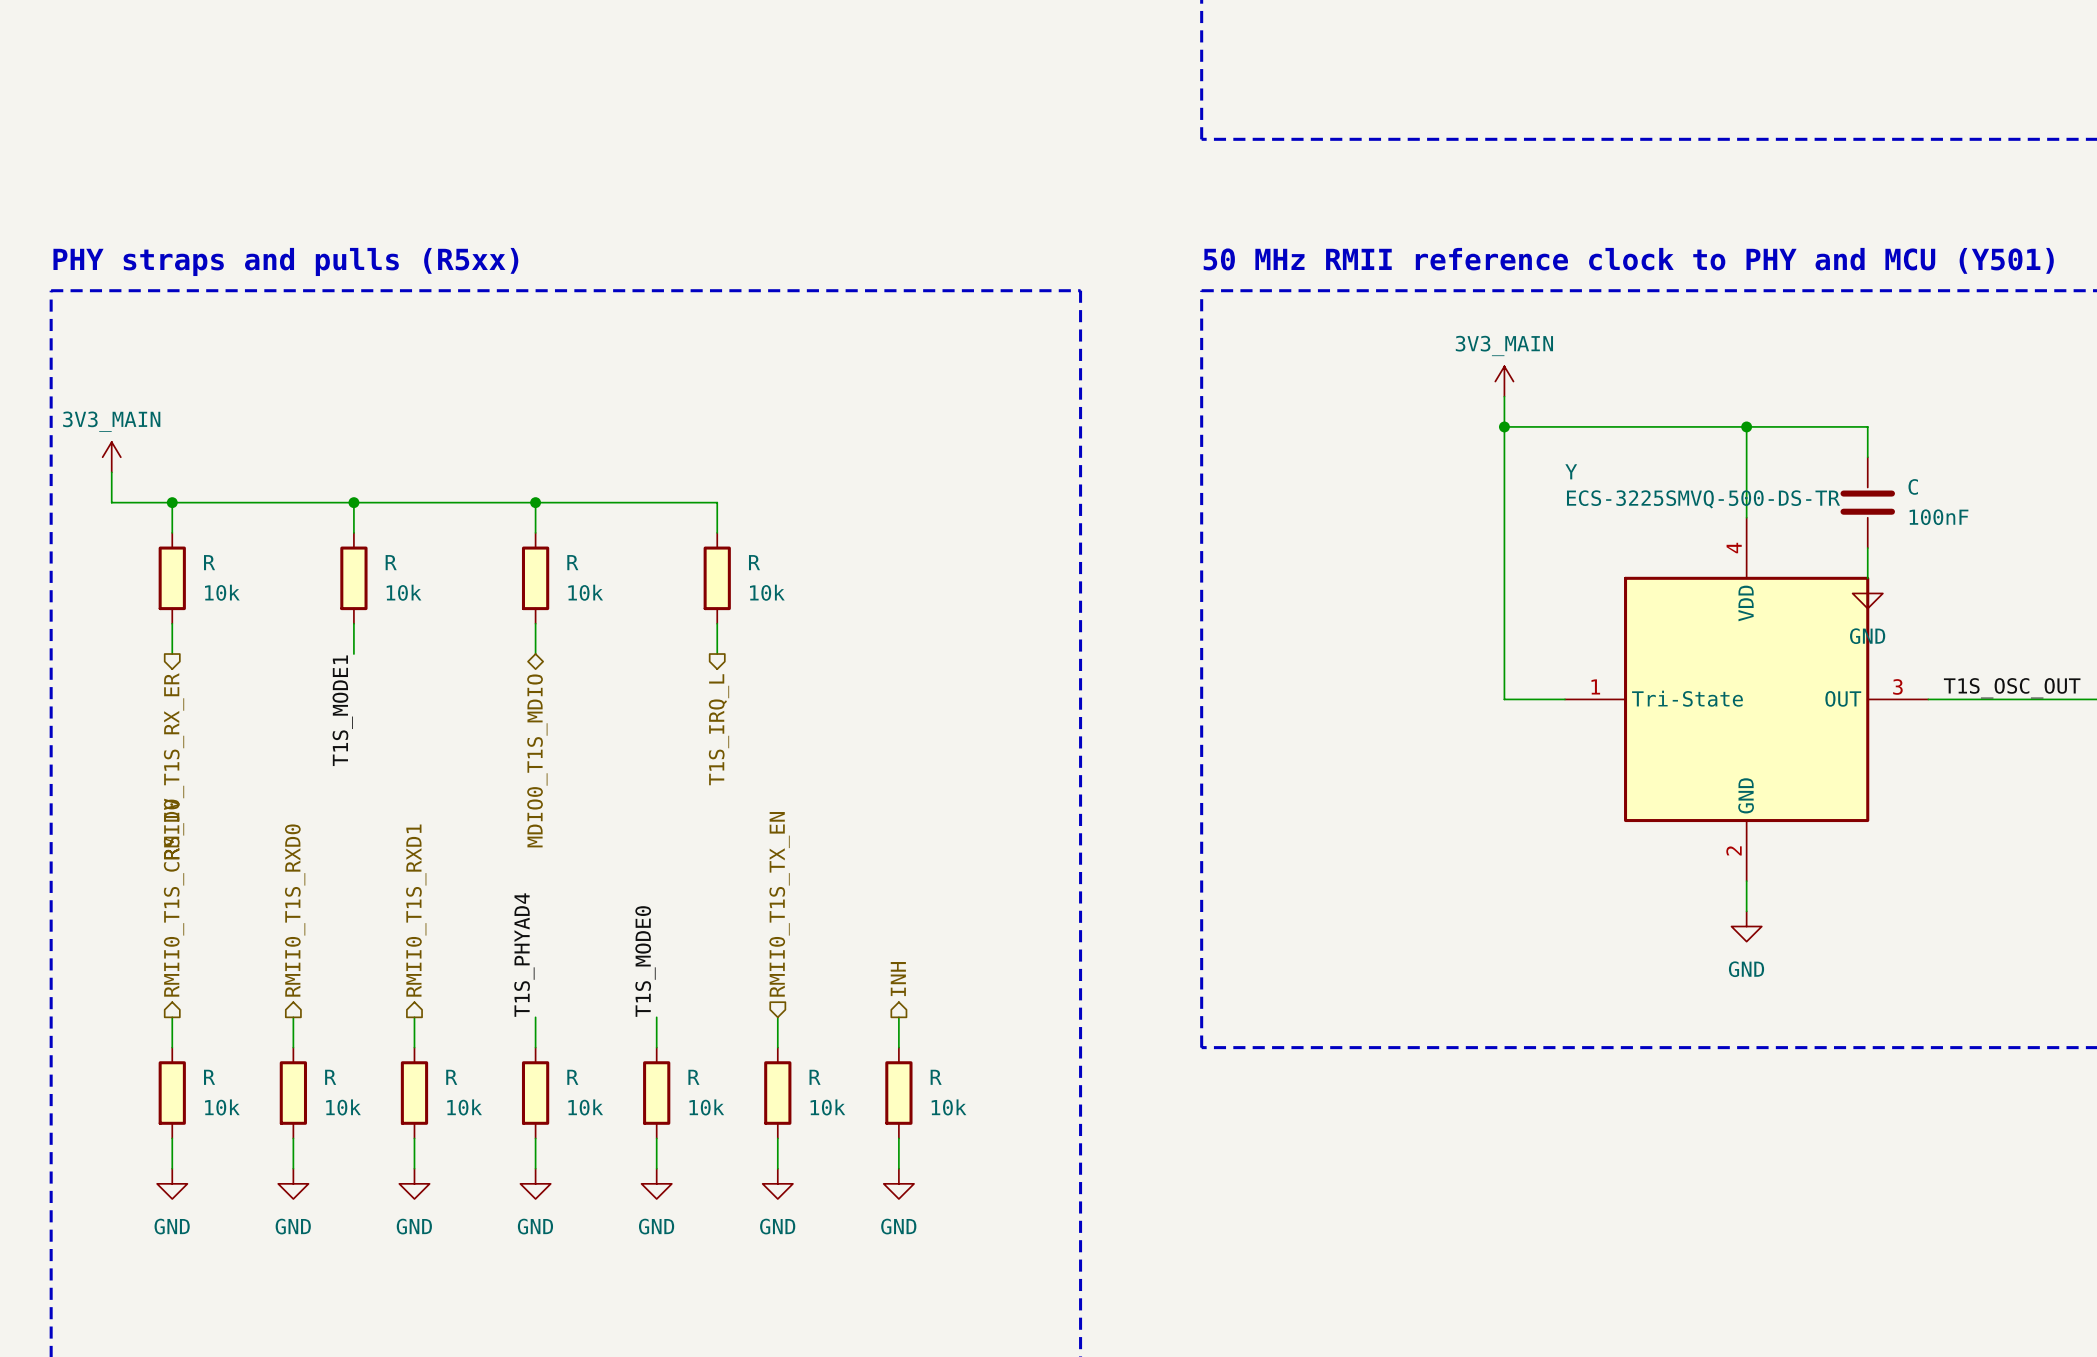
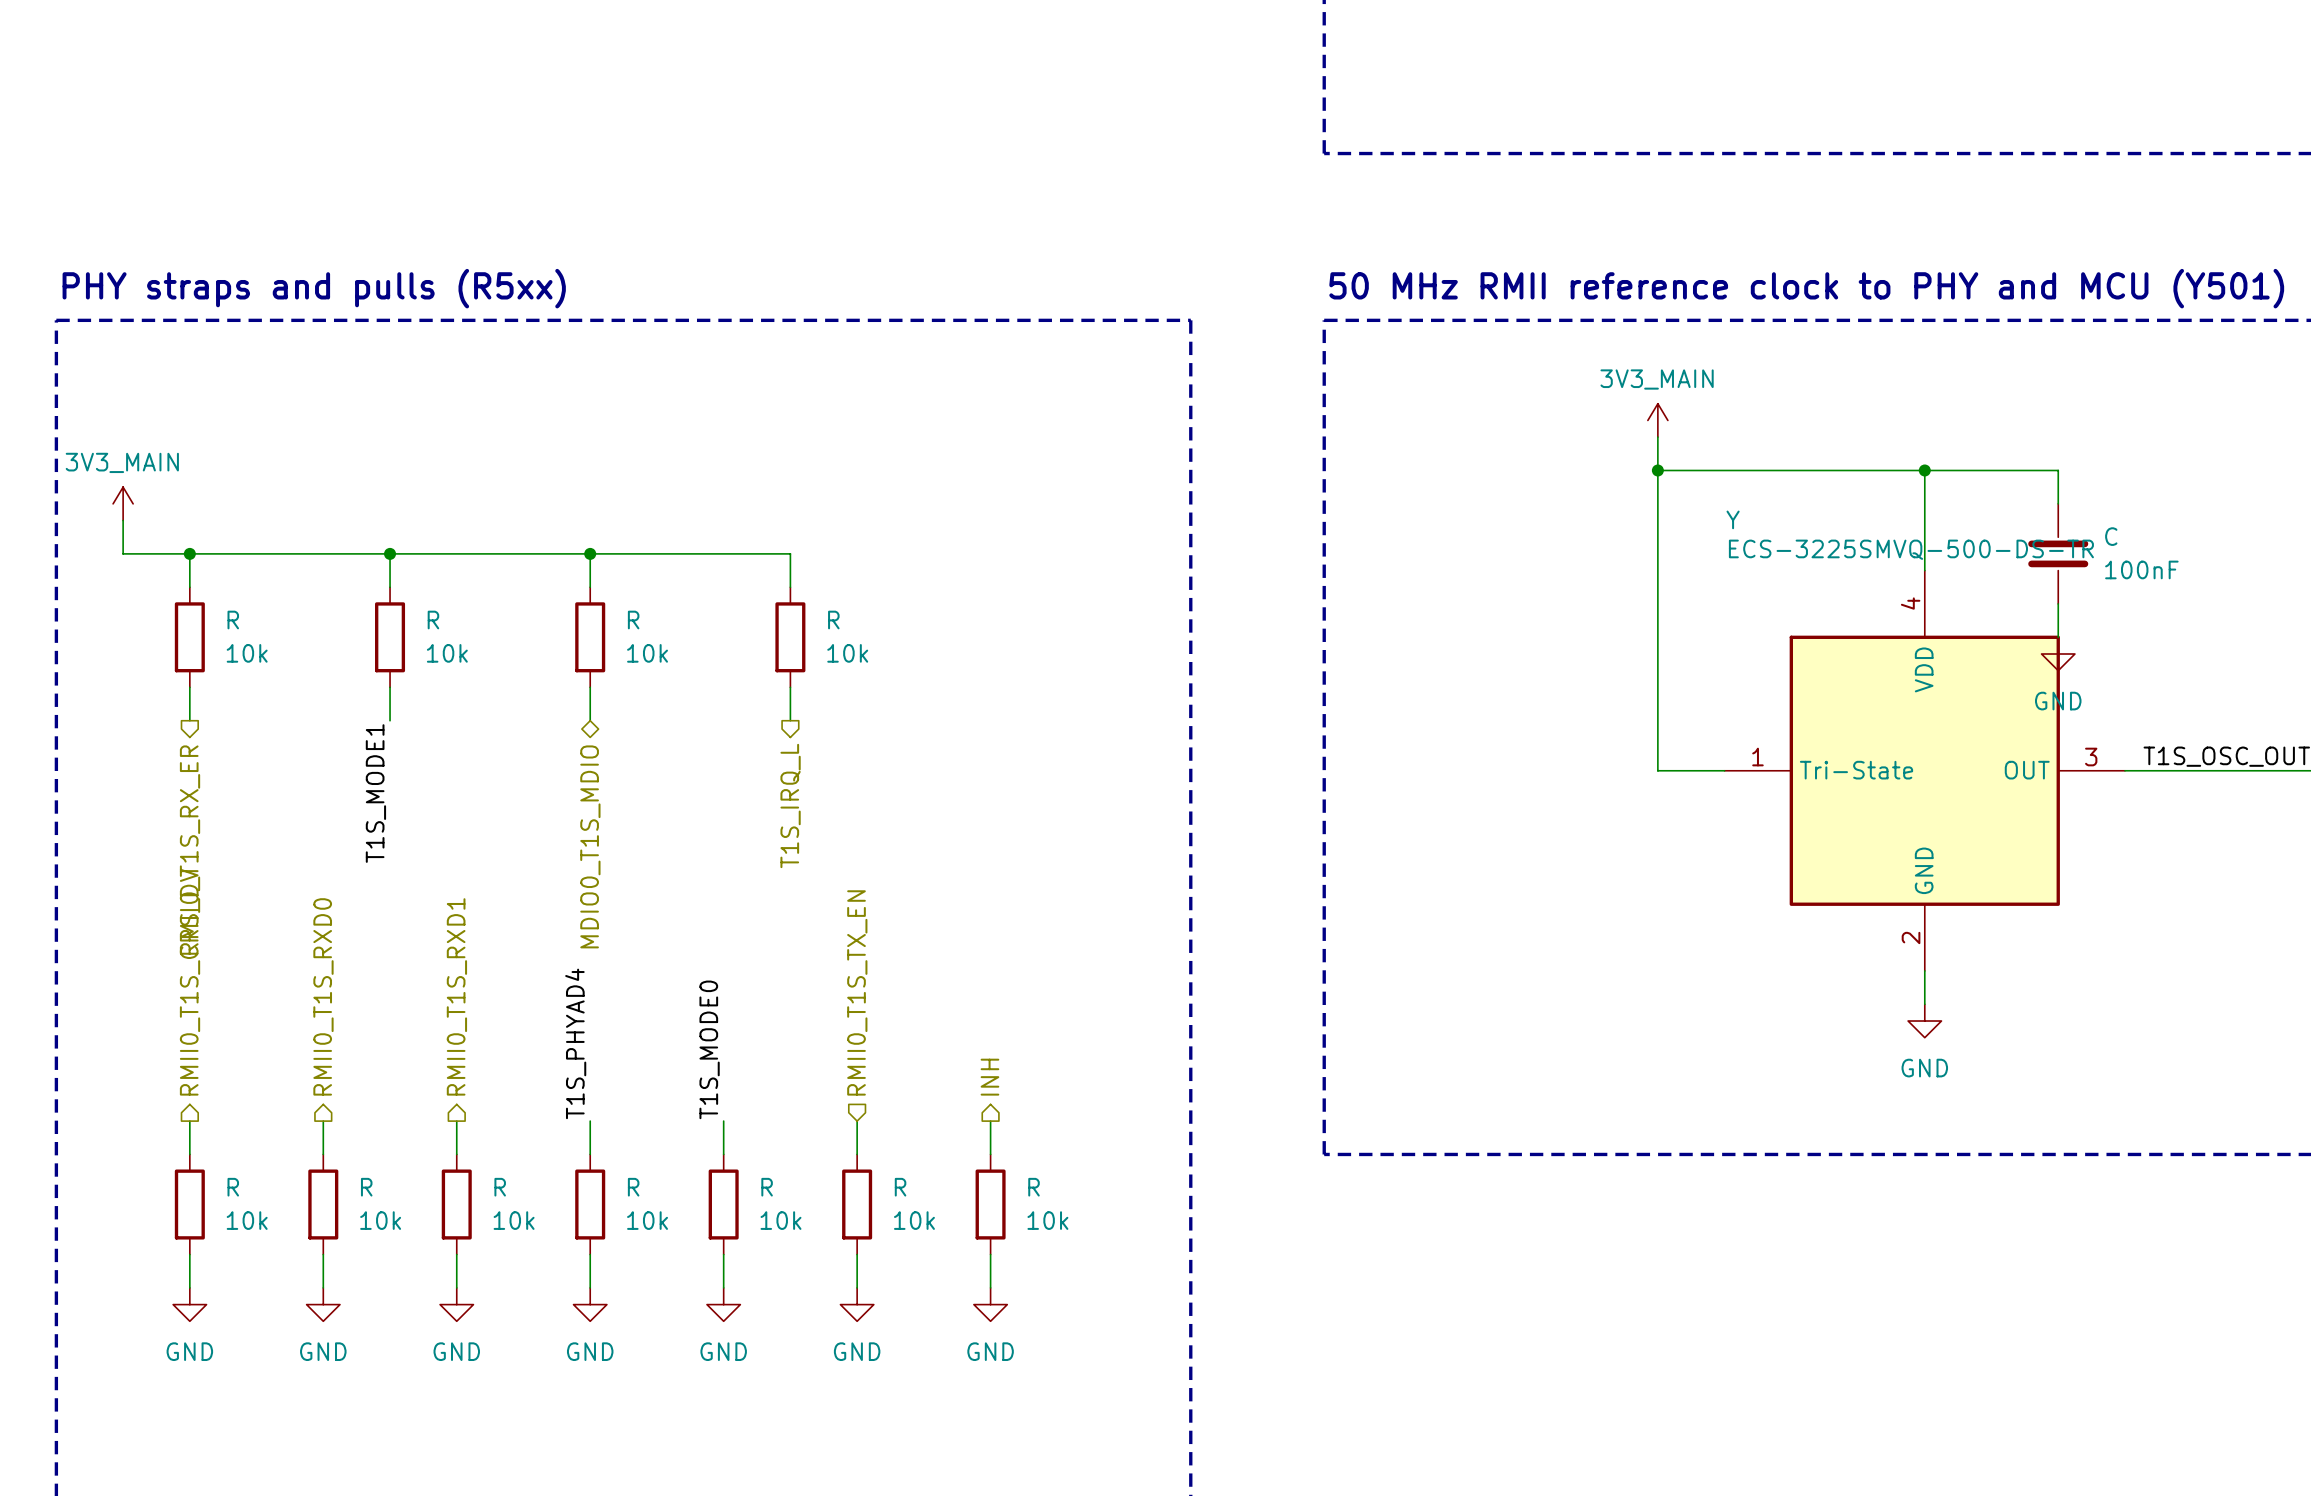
R symbol: [158, 532, 186, 624] -> [174, 587, 205, 688]
R symbol: [340, 532, 368, 624] -> [375, 587, 406, 688]
R symbol: [521, 532, 550, 624] -> [575, 587, 606, 688]
R symbol: [703, 532, 731, 624] -> [775, 587, 806, 688]
R symbol: [158, 1047, 186, 1139] -> [174, 1154, 205, 1255]
R symbol: [279, 1047, 308, 1139] -> [308, 1154, 339, 1255]
R symbol: [400, 1047, 429, 1139] -> [441, 1154, 472, 1255]
R symbol: [521, 1047, 550, 1139] -> [575, 1154, 606, 1255]
R symbol: [643, 1047, 671, 1139] -> [708, 1154, 739, 1255]
R symbol: [764, 1047, 792, 1139] -> [842, 1154, 873, 1255]
R symbol: [885, 1047, 913, 1139] -> [975, 1154, 1006, 1255]

